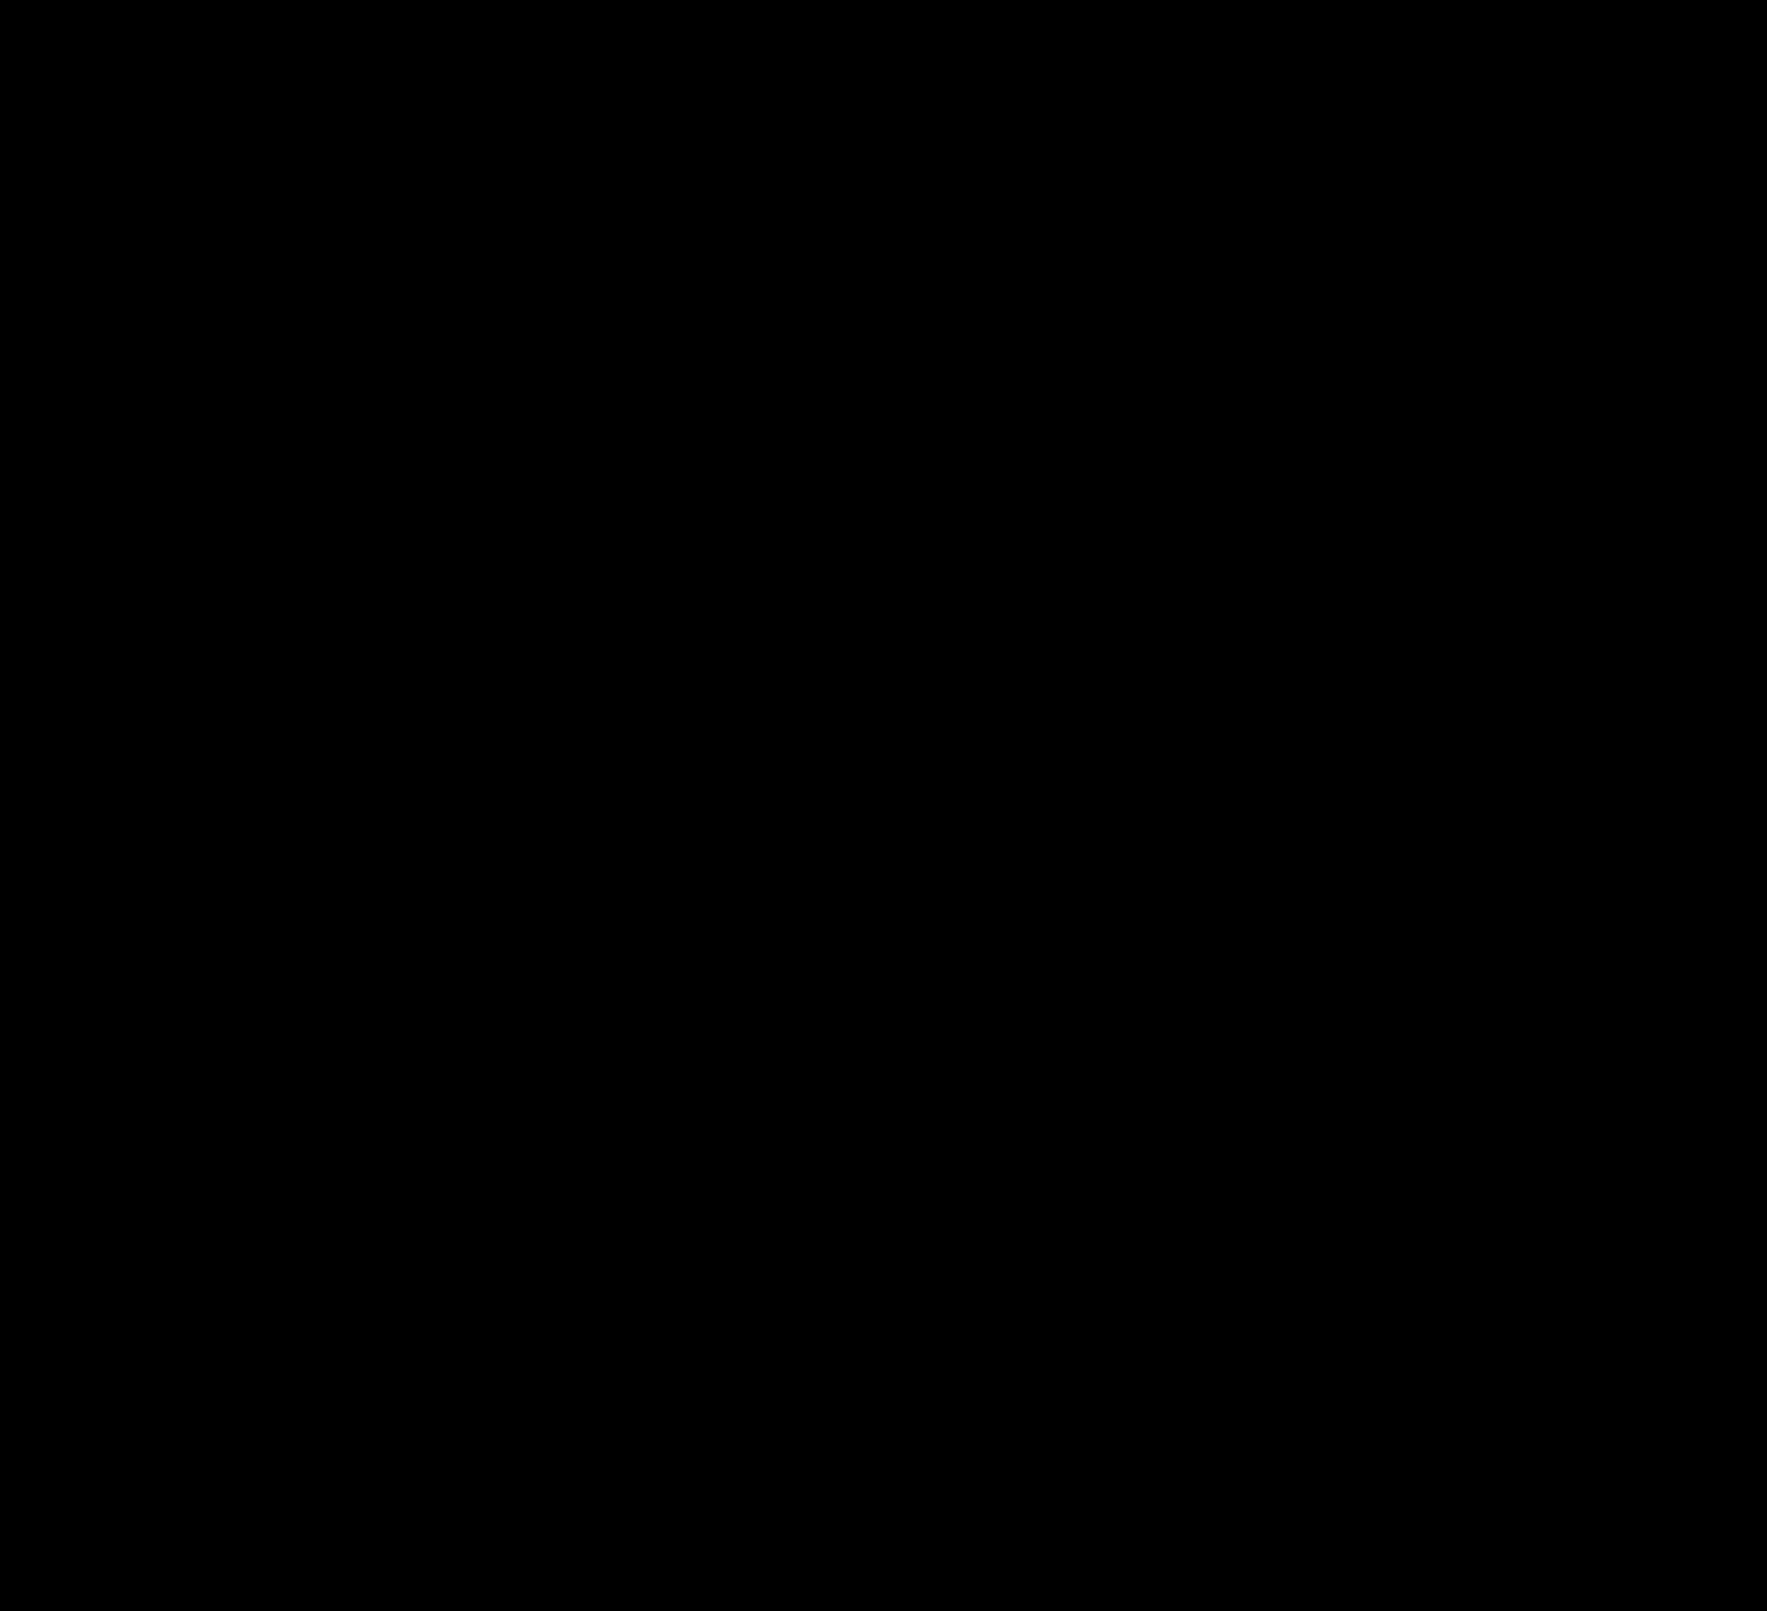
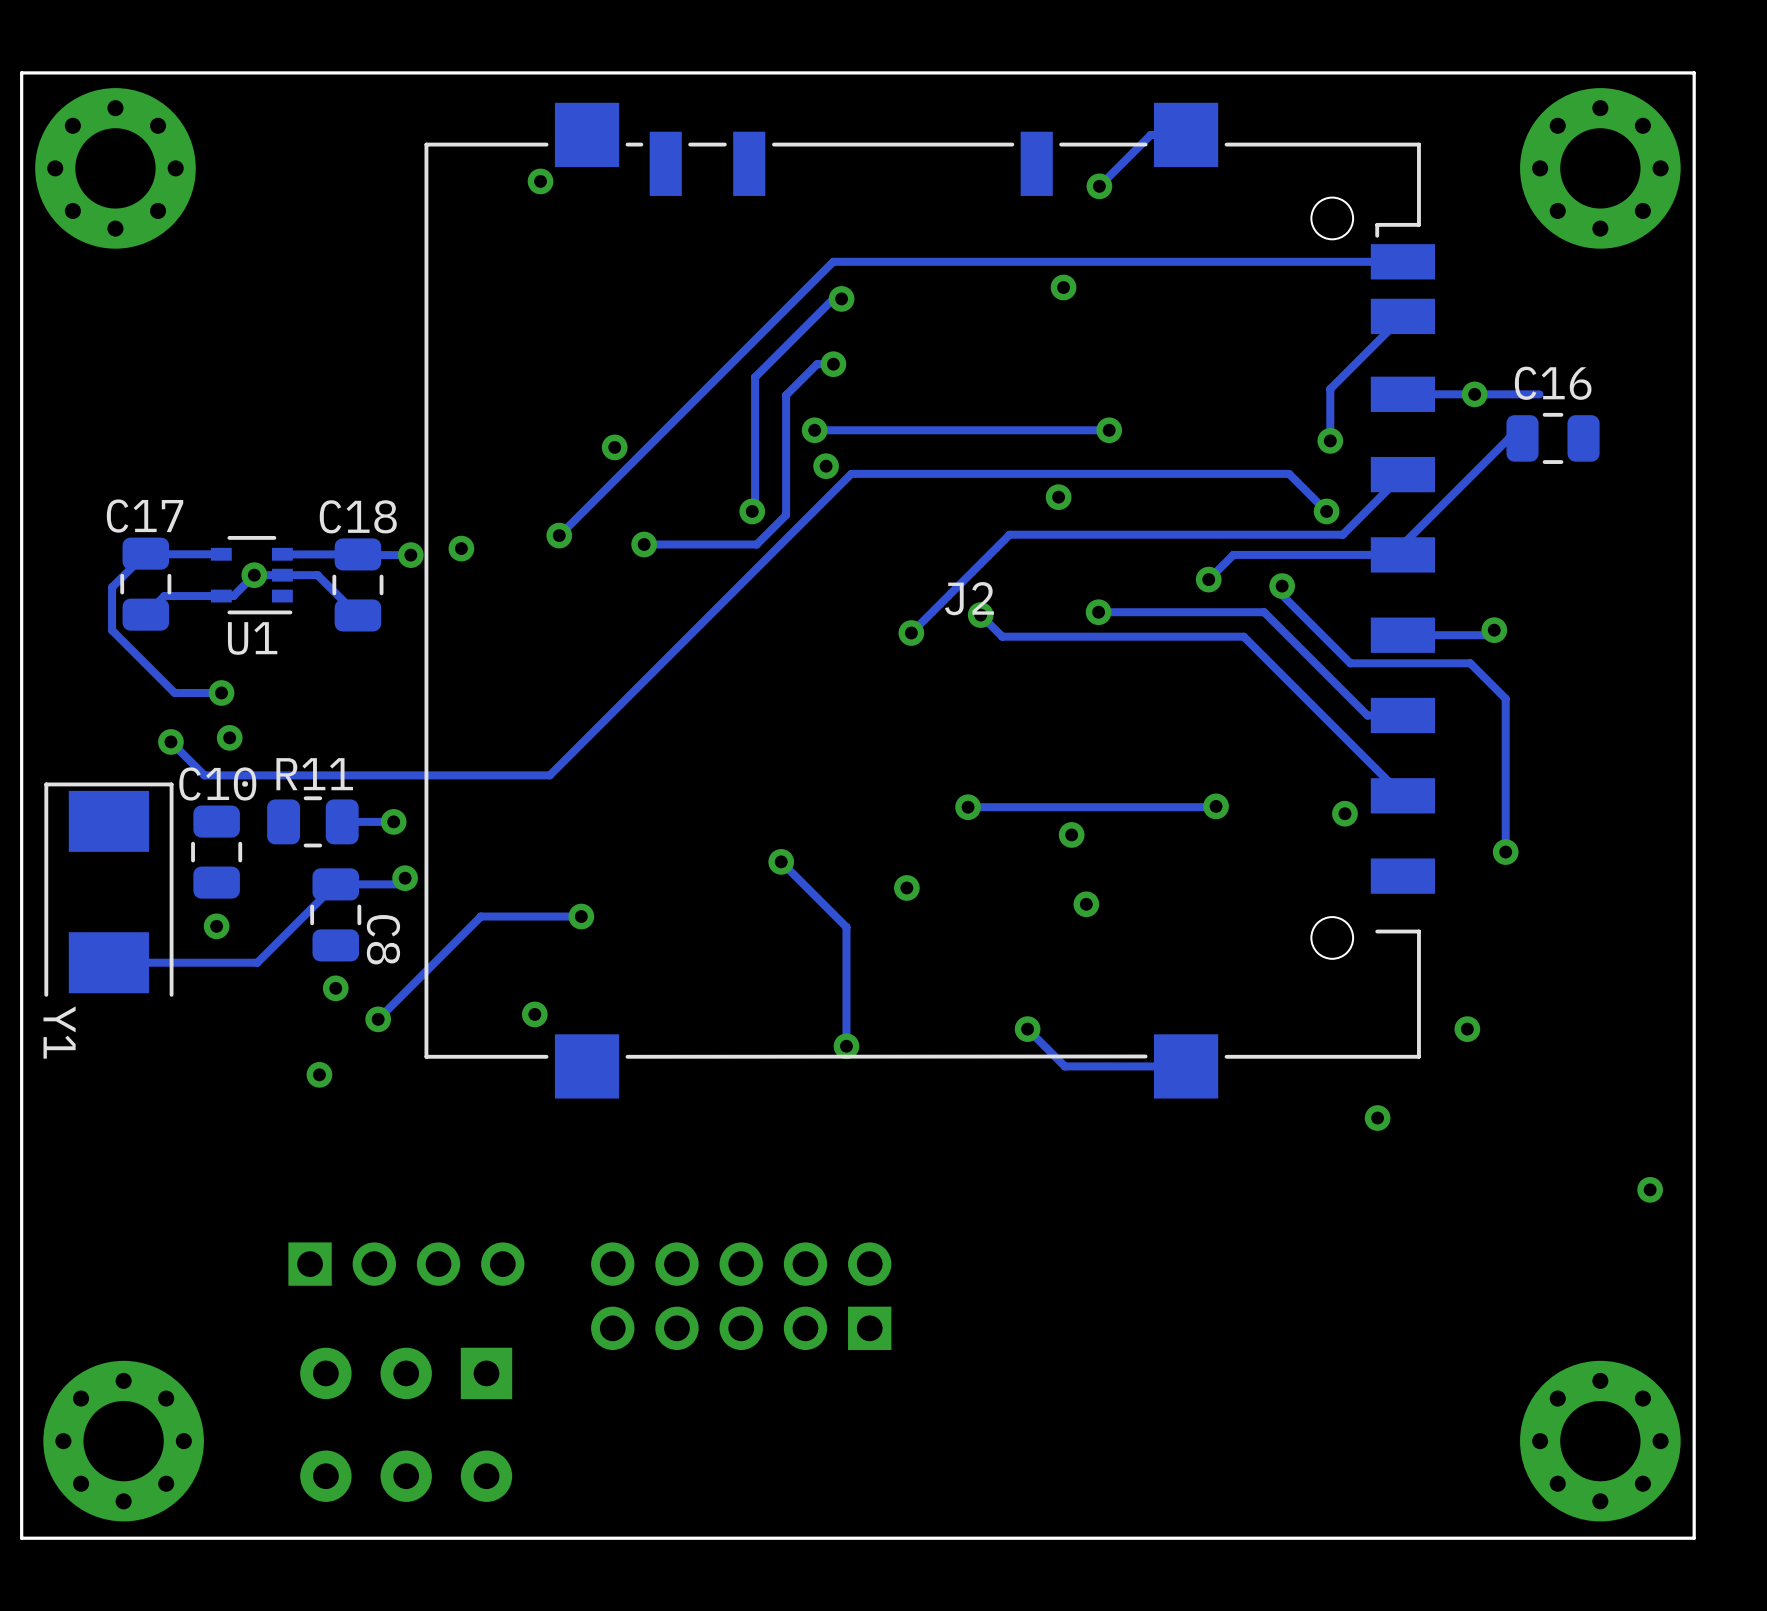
board edge: none -> (1694, 72) (21, 72) (21, 1538) (1694, 1538) (1694, 72)
track: none -> (1186, 134) (1150, 134) (1099, 186)
part: none -> (115, 168)
part: none -> (1600, 168)
via: none -> (540, 181)
via: none -> (1099, 186)
track: none -> (1402, 261) (833, 261) (559, 535)
via: none -> (1063, 287)
track: none -> (841, 298) (833, 298) (755, 377) (755, 508) (752, 511)
via: none -> (841, 298)
track: none -> (1402, 316) (1330, 389) (1330, 440)
track: none -> (833, 364) (817, 364) (786, 395) (786, 515) (756, 544) (644, 544)
via: none -> (833, 364)
via: none -> (1474, 394)
track: none -> (1539, 394) (1402, 394)
via: none -> (814, 430)
track: none -> (1109, 430) (814, 430)
via: none -> (1109, 430)
track: none -> (1522, 438) (1508, 438) (1402, 544) (1402, 554) (1233, 554) (1208, 579)
C16: none -> (1553, 438)
via: none -> (1330, 440)
via: none -> (614, 447)
via: none -> (826, 466)
track: none -> (1402, 474) (1342, 534) (1009, 534) (911, 633)
via: none -> (1058, 497)
via: none -> (752, 511)
track: none -> (1326, 511) (1289, 473) (851, 473) (549, 775) (204, 775) (170, 741)
via: none -> (1326, 511)
via: none -> (559, 535)
via: none -> (644, 544)
via: none -> (461, 548)
track: none -> (221, 554) (145, 553) (112, 587) (112, 630) (174, 692) (221, 692)
track: none -> (282, 554) (410, 555)
via: none -> (410, 555)
U1: none -> (251, 575)
via: none -> (254, 575)
via: none -> (1208, 579)
C17: none -> (145, 584)
C18: none -> (357, 584)
track: none -> (1282, 586) (1282, 595) (1350, 663) (1470, 663) (1505, 698) (1505, 852)
via: none -> (1282, 586)
J2: none -> (929, 600)
track: none -> (1098, 612) (1264, 612) (1367, 715) (1402, 715)
via: none -> (1098, 612)
track: none -> (145, 614) (164, 596) (233, 596) (254, 575) (317, 575) (357, 615)
track: none -> (980, 615) (1002, 636) (1243, 636) (1402, 795)
via: none -> (980, 615)
track: none -> (1494, 630) (1489, 635) (1402, 635)
via: none -> (1494, 630)
via: none -> (911, 633)
via: none -> (221, 692)
via: none -> (229, 737)
via: none -> (170, 741)
track: none -> (1216, 806) (968, 807)
via: none -> (1216, 806)
via: none -> (968, 807)
via: none -> (1344, 813)
R11: none -> (312, 821)
track: none -> (393, 821) (342, 821)
via: none -> (393, 821)
via: none -> (1071, 834)
C10: none -> (216, 852)
via: none -> (1505, 852)
track: none -> (781, 861) (846, 927) (846, 1046)
via: none -> (781, 861)
track: none -> (405, 878) (398, 884) (335, 884) (257, 962) (108, 962)
via: none -> (405, 878)
via: none -> (906, 887)
Y1: none -> (108, 889)
via: none -> (1086, 904)
C8: none -> (335, 914)
track: none -> (581, 916) (480, 916) (378, 1019)
via: none -> (581, 916)
via: none -> (216, 926)
via: none -> (335, 988)
via: none -> (534, 1014)
via: none -> (378, 1019)
track: none -> (1027, 1029) (1064, 1066) (1186, 1066)
via: none -> (1027, 1029)
via: none -> (1467, 1029)
via: none -> (846, 1046)
via: none -> (319, 1074)
via: none -> (1377, 1118)
via: none -> (1650, 1189)
part: none -> (406, 1264)
part: none -> (741, 1296)
part: none -> (406, 1424)
part: none -> (123, 1441)
part: none -> (1600, 1441)

